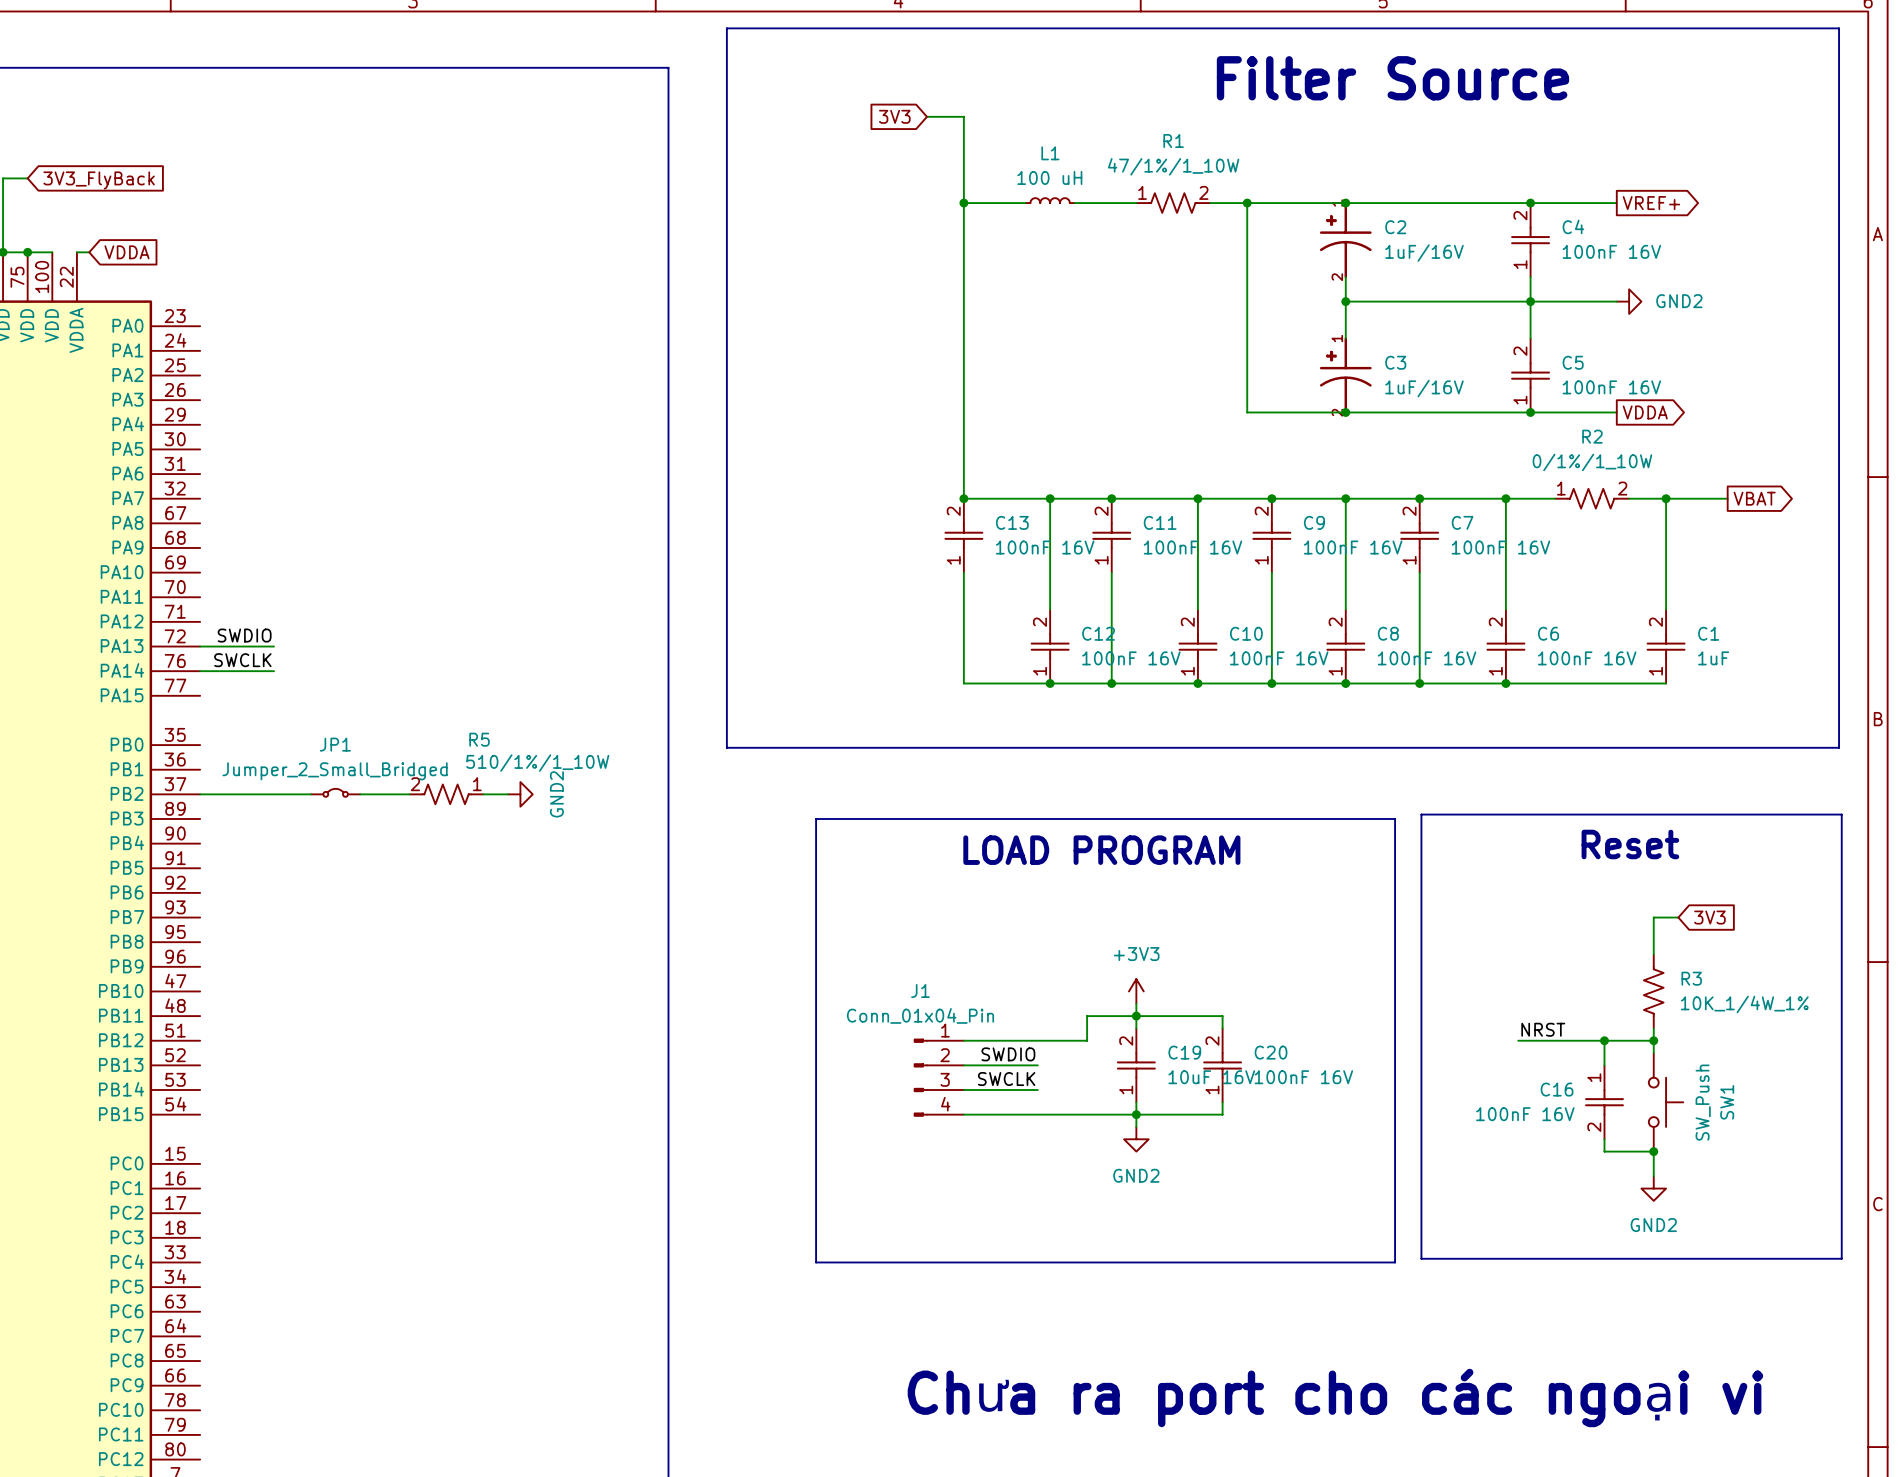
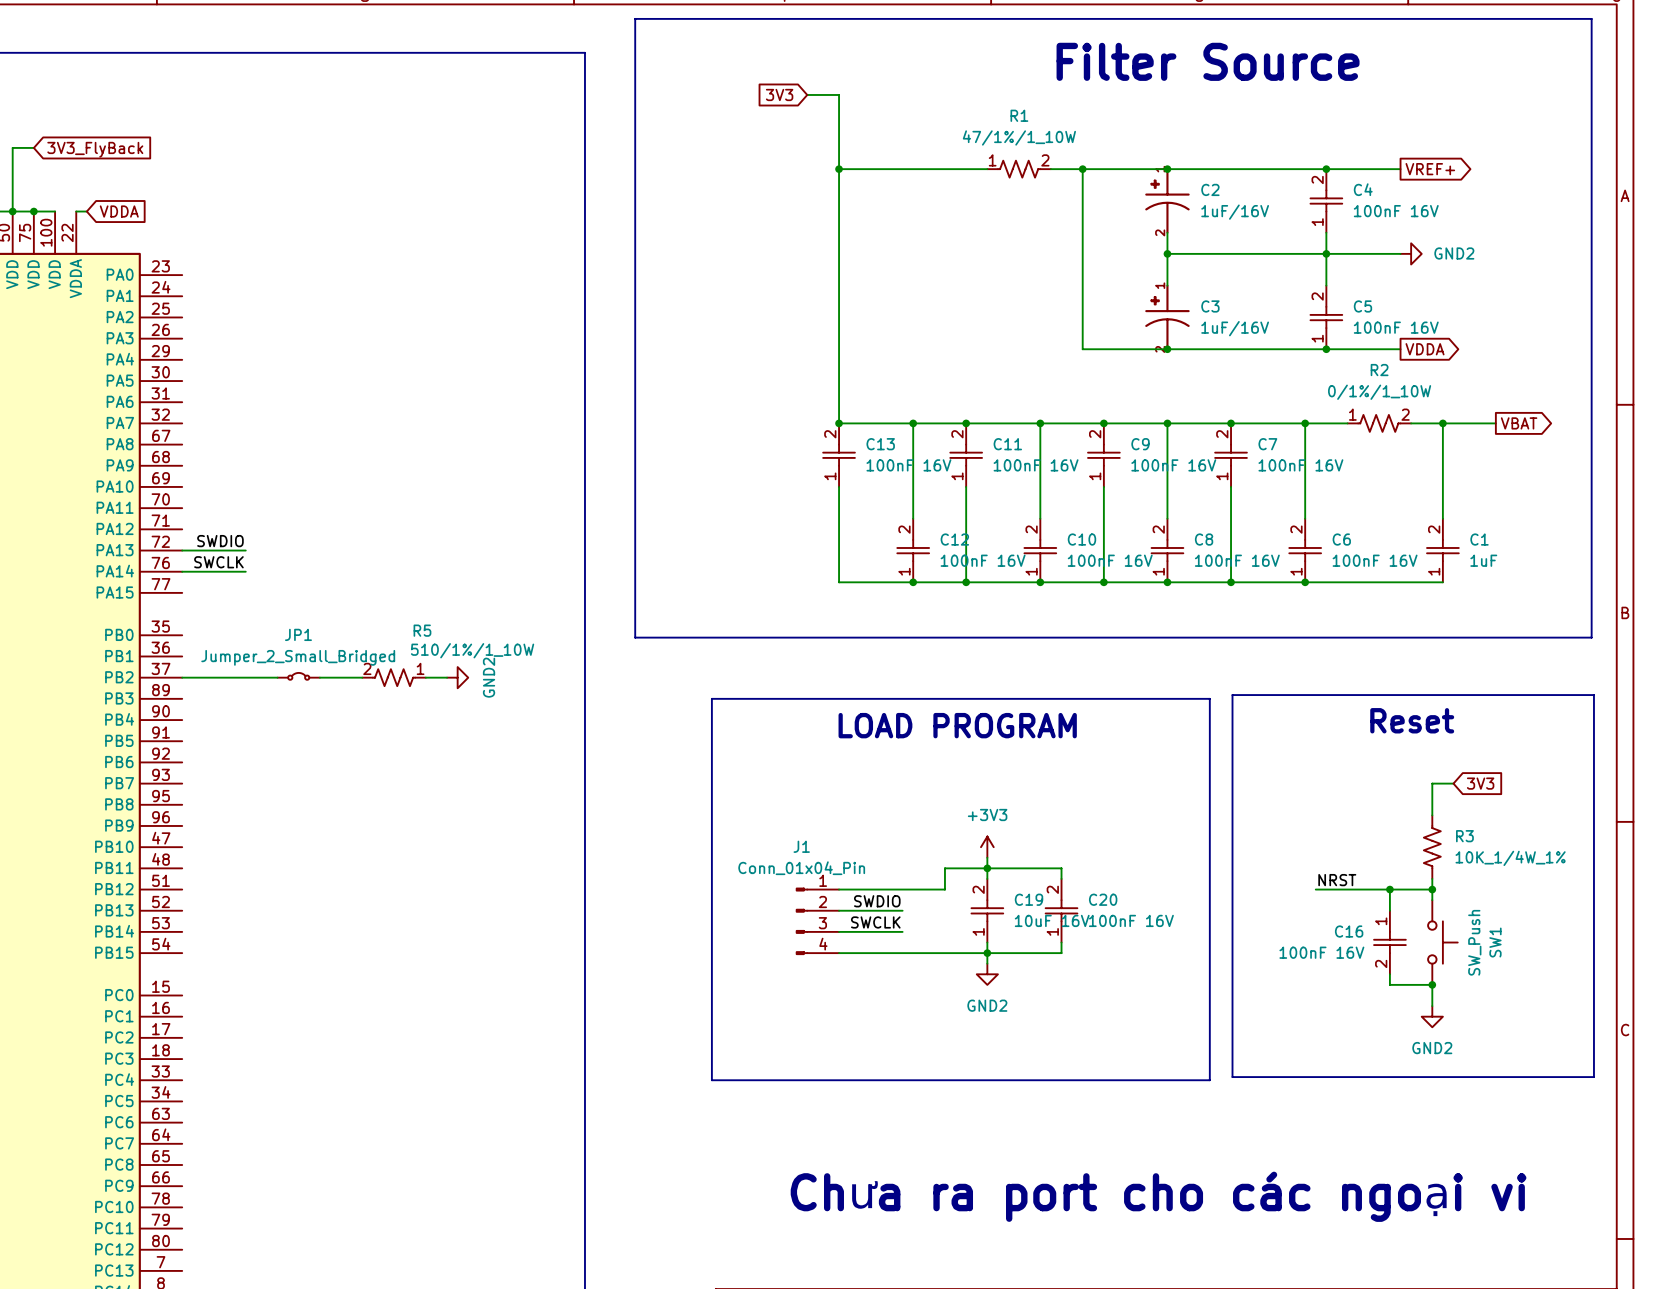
L1: 100 uH (1050, 200) -> none
wire: none -> (892, 169) (934, 169)

